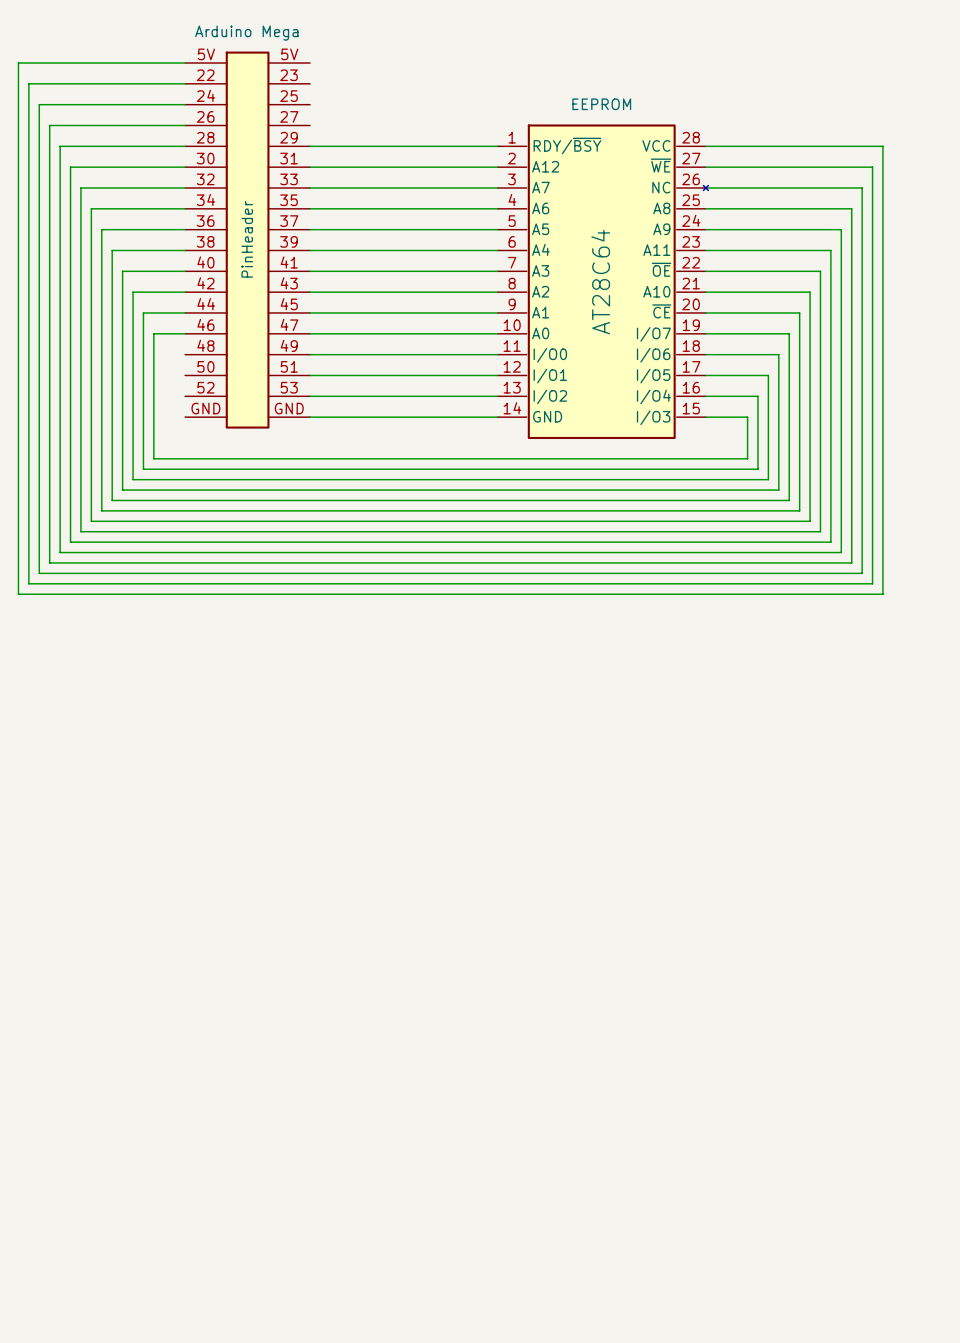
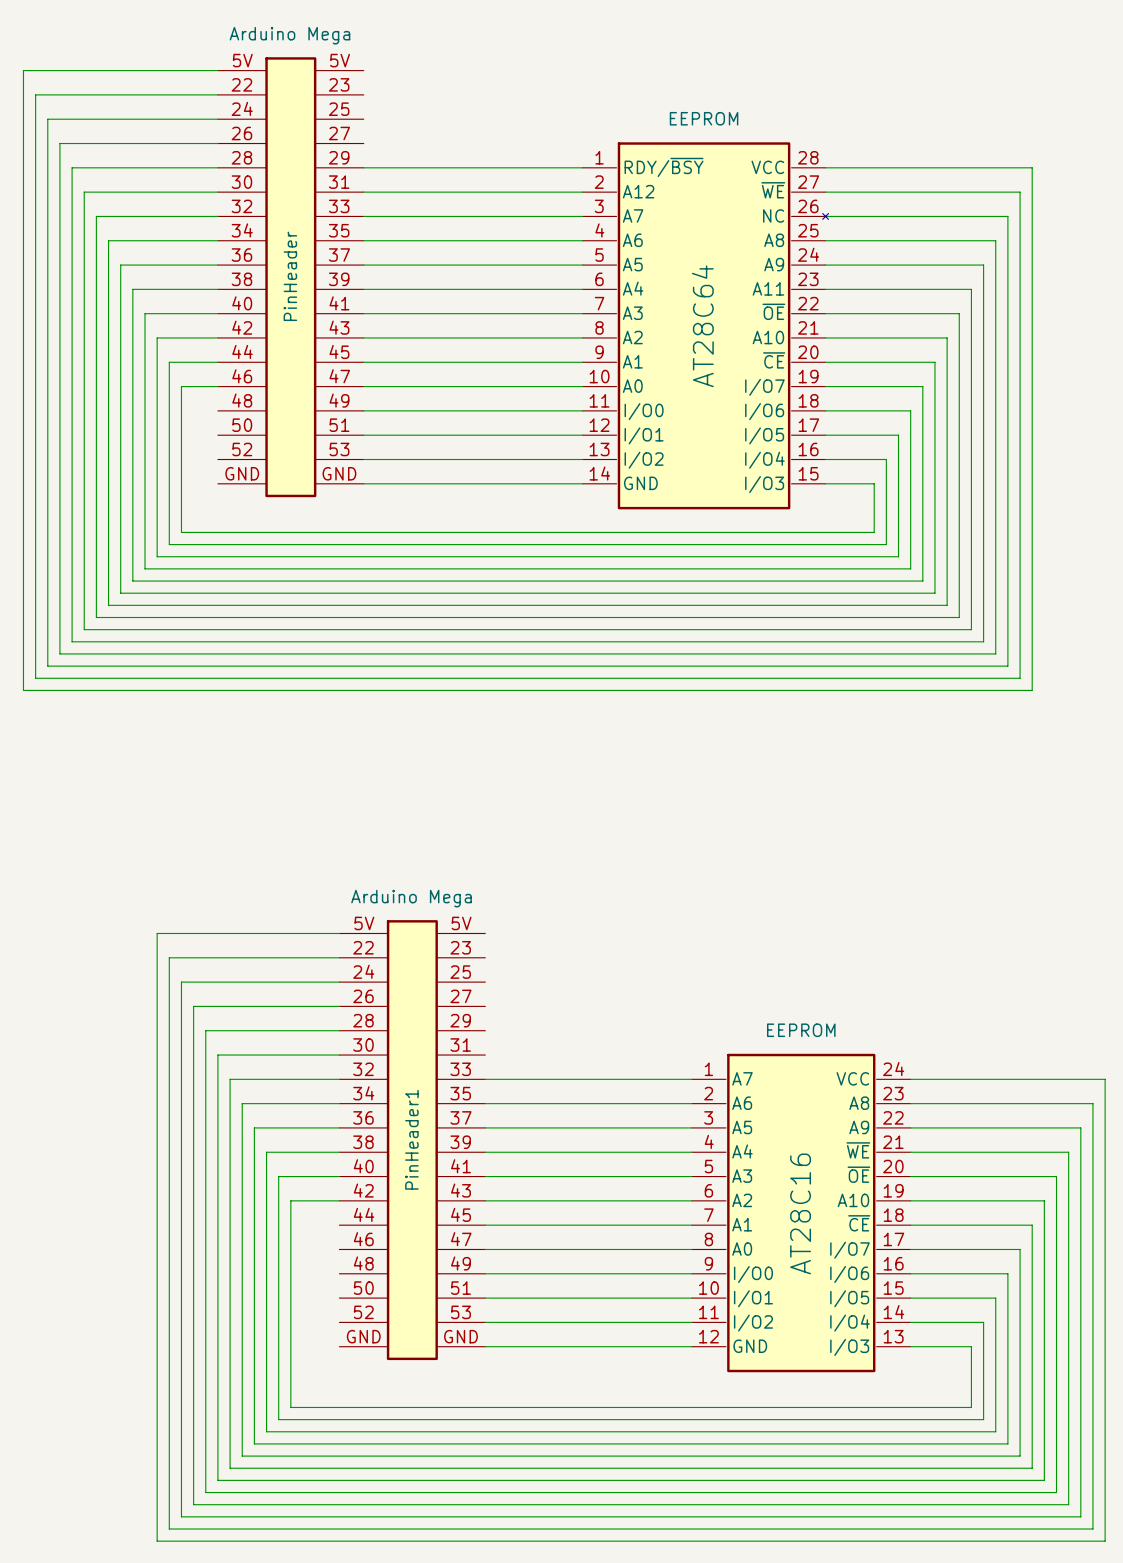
wire: none -> (339, 933) (157, 933) (157, 1541) (1105, 1541) (1105, 1079) (910, 1079)
wire: none -> (339, 957) (169, 957) (169, 1529) (1092, 1529) (1092, 1103) (910, 1103)
wire: none -> (339, 982) (181, 982) (181, 1516) (1080, 1516) (1080, 1127) (910, 1127)
wire: none -> (339, 1006) (193, 1006) (193, 1504) (1068, 1504) (1068, 1152) (910, 1152)
wire: none -> (339, 1030) (205, 1030) (205, 1492) (1056, 1492) (1056, 1176) (910, 1176)
wire: none -> (339, 1055) (217, 1055) (217, 1480) (1044, 1480) (1044, 1200) (910, 1200)
wire: none -> (339, 1079) (230, 1079) (230, 1468) (1032, 1468) (1032, 1225) (910, 1225)
wire: none -> (485, 1079) (691, 1079)
wire: none -> (339, 1103) (242, 1103) (242, 1456) (1020, 1456) (1020, 1249) (910, 1249)
wire: none -> (485, 1103) (691, 1103)
wire: none -> (339, 1127) (254, 1127) (254, 1443) (1007, 1443) (1007, 1273) (910, 1273)
wire: none -> (485, 1127) (691, 1127)
PinHeader1: none -> Arduino Mega (412, 1140)
wire: none -> (339, 1152) (266, 1152) (266, 1431) (995, 1431) (995, 1298) (910, 1298)
wire: none -> (485, 1152) (691, 1152)
wire: none -> (339, 1176) (278, 1176) (278, 1419) (983, 1419) (983, 1322) (910, 1322)
wire: none -> (485, 1176) (691, 1176)
wire: none -> (339, 1200) (290, 1200) (290, 1407) (971, 1407) (971, 1346) (910, 1346)
wire: none -> (485, 1200) (691, 1200)
AT28C16: none -> EEPROM (801, 1213)
wire: none -> (485, 1225) (691, 1225)
wire: none -> (485, 1249) (691, 1249)
wire: none -> (485, 1273) (691, 1273)
wire: none -> (485, 1298) (691, 1298)
wire: none -> (485, 1322) (691, 1322)
wire: none -> (485, 1346) (691, 1346)

